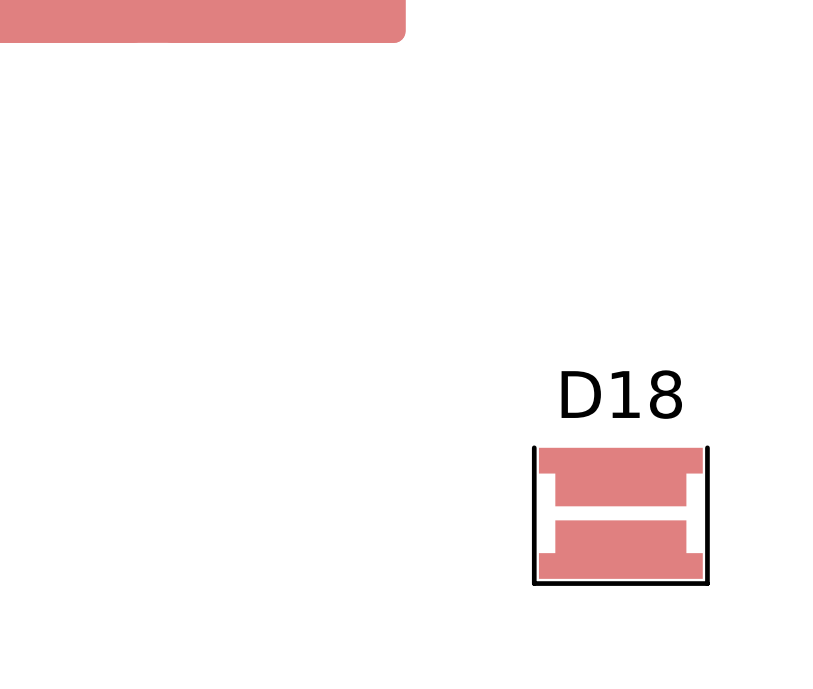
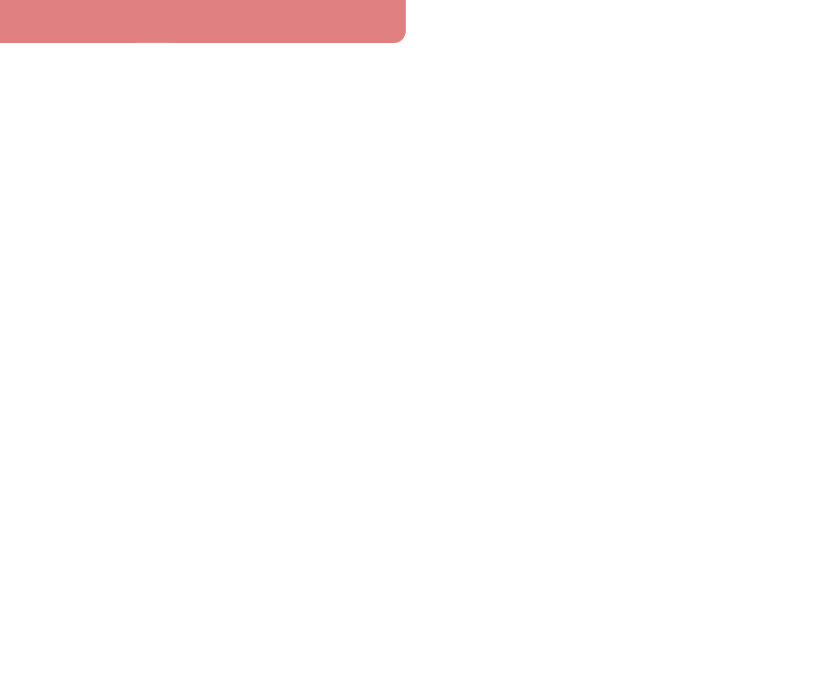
D18: (620, 515) -> none

